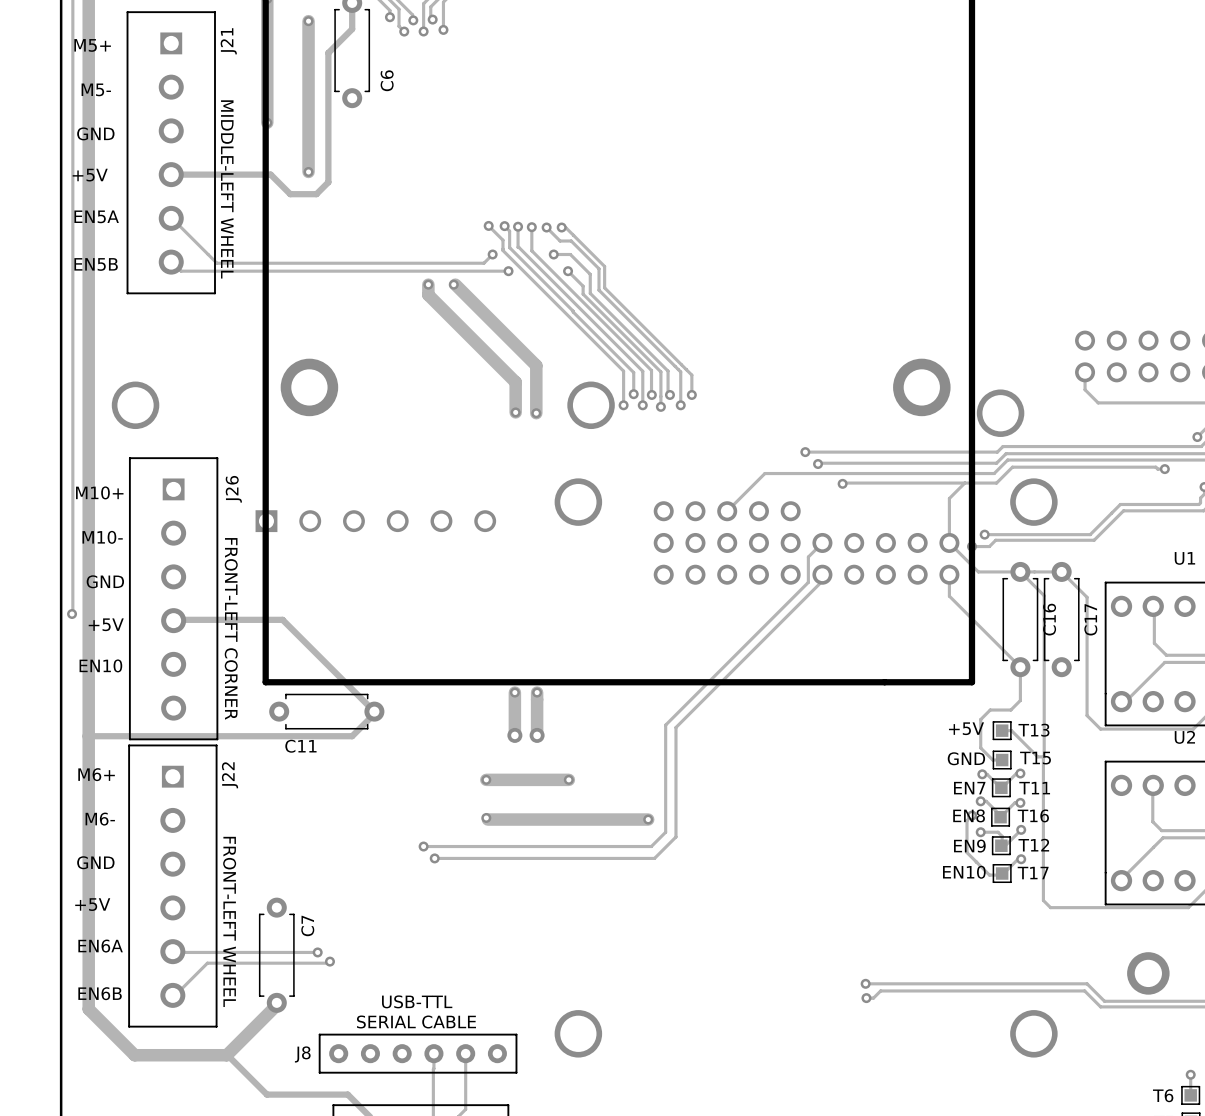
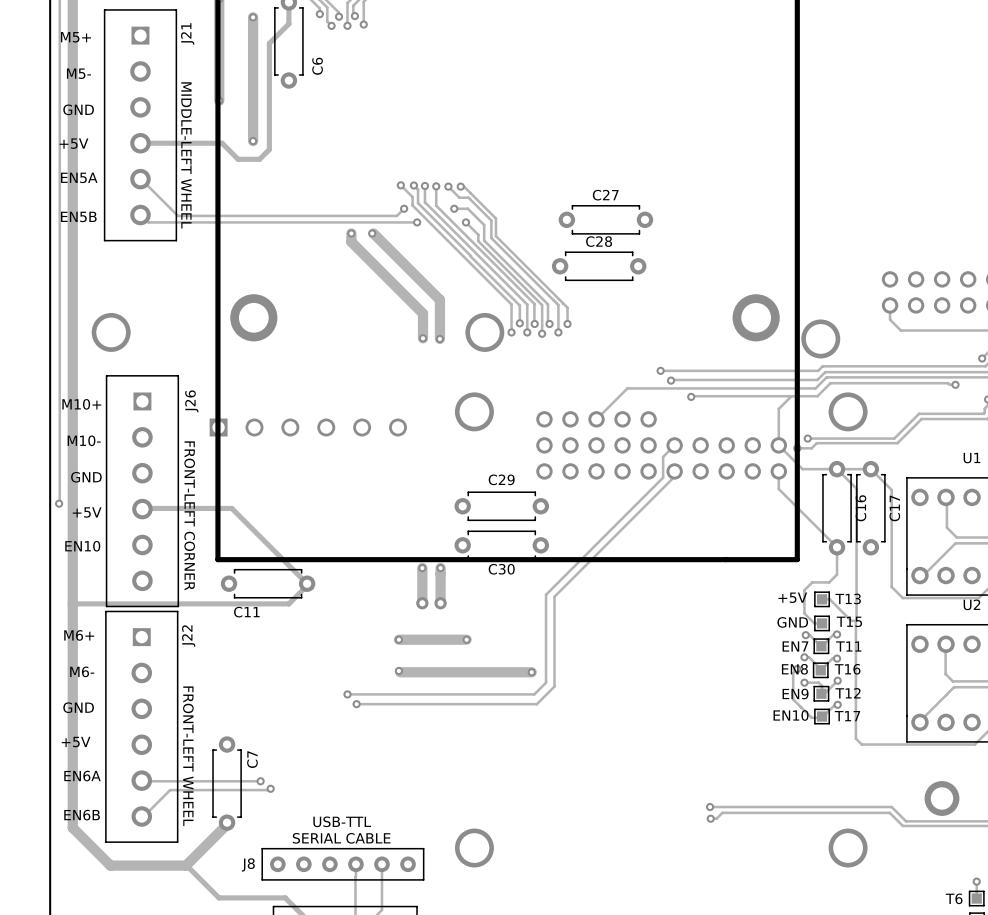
C27: none -> (605, 219)
C28: none -> (599, 266)
C29: none -> (501, 506)
C30: none -> (501, 545)

